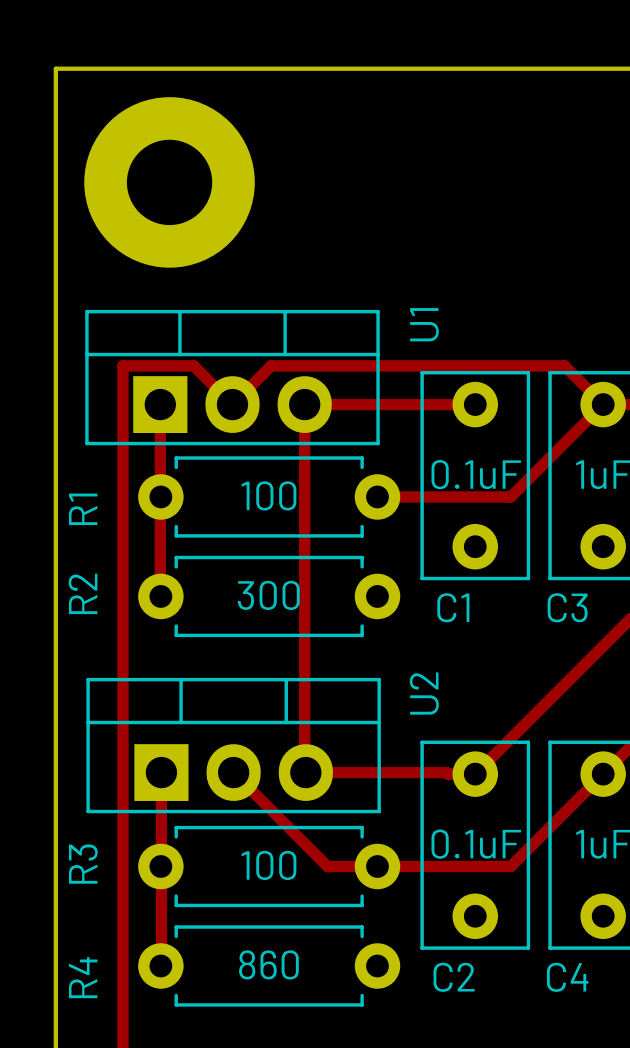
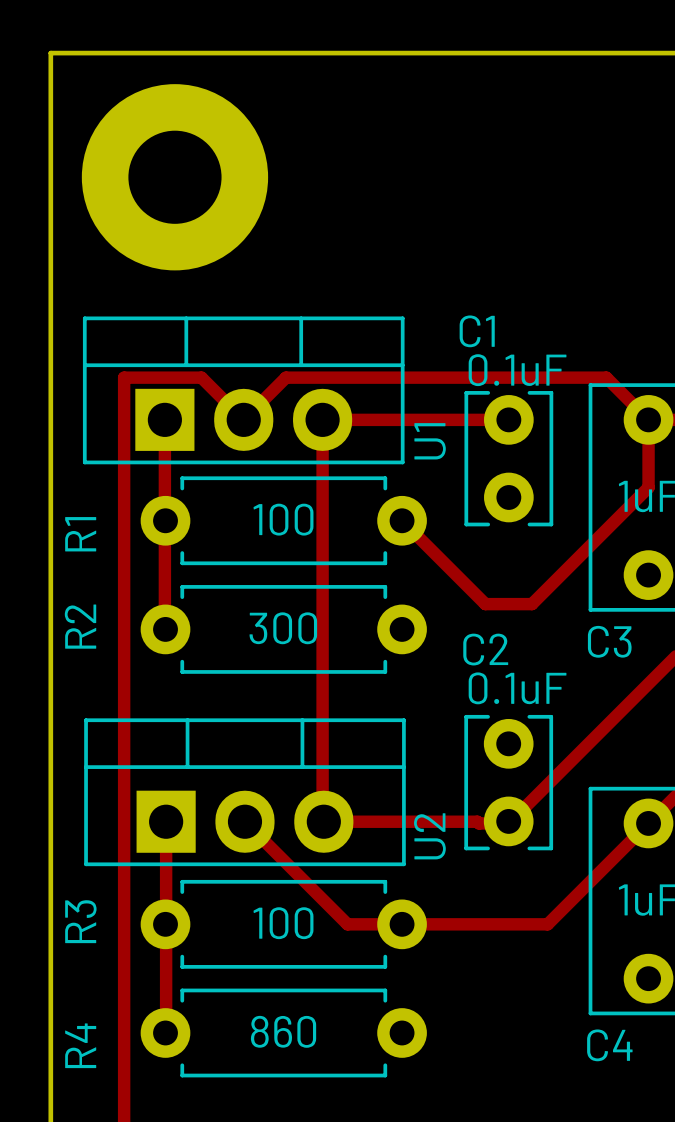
U1 name position: U1 (424, 324) -> U1 (430, 441)
C1 footprint: [420, 371, 531, 581] -> [464, 391, 554, 527]
track: (603, 404) (510, 496) (377, 496) -> (648, 419) (648, 487) (531, 604) (485, 604) (402, 520)
C1 value position: 0.1uF (476, 474) -> 0.1uF (517, 370)
C1 name position: C1 (453, 607) -> C1 (477, 331)
U2 name position: U2 (424, 693) -> U2 (429, 836)
C2 footprint: [420, 740, 531, 950] -> [464, 714, 554, 851]
C2 value position: 0.1uF (476, 844) -> 0.1uF (517, 688)
C2 name position: C2 (454, 977) -> C2 (485, 649)

